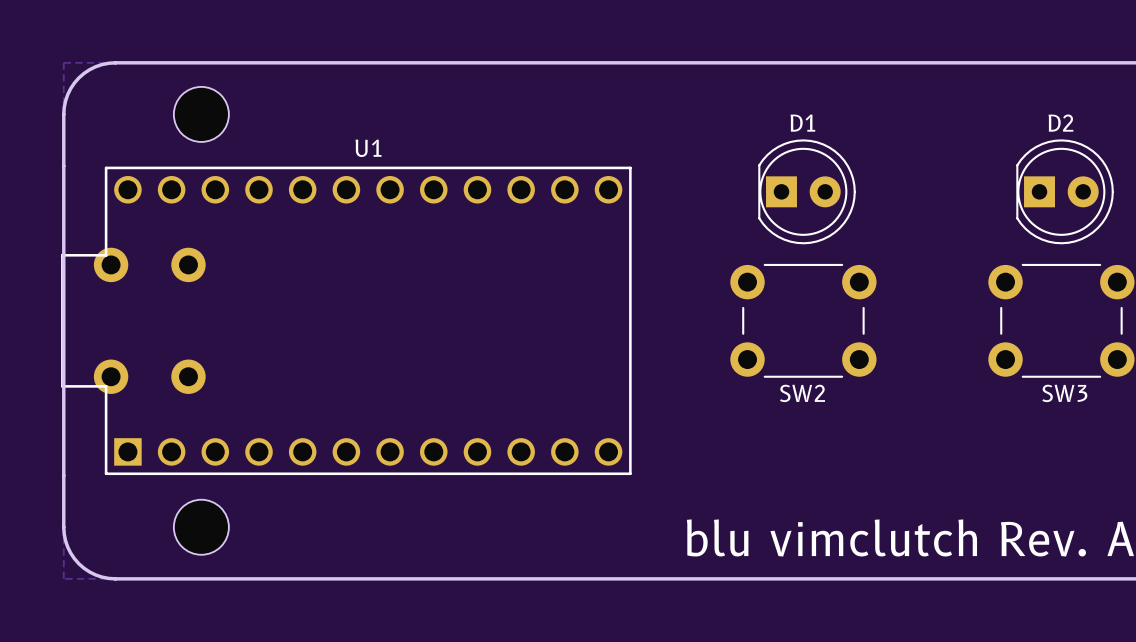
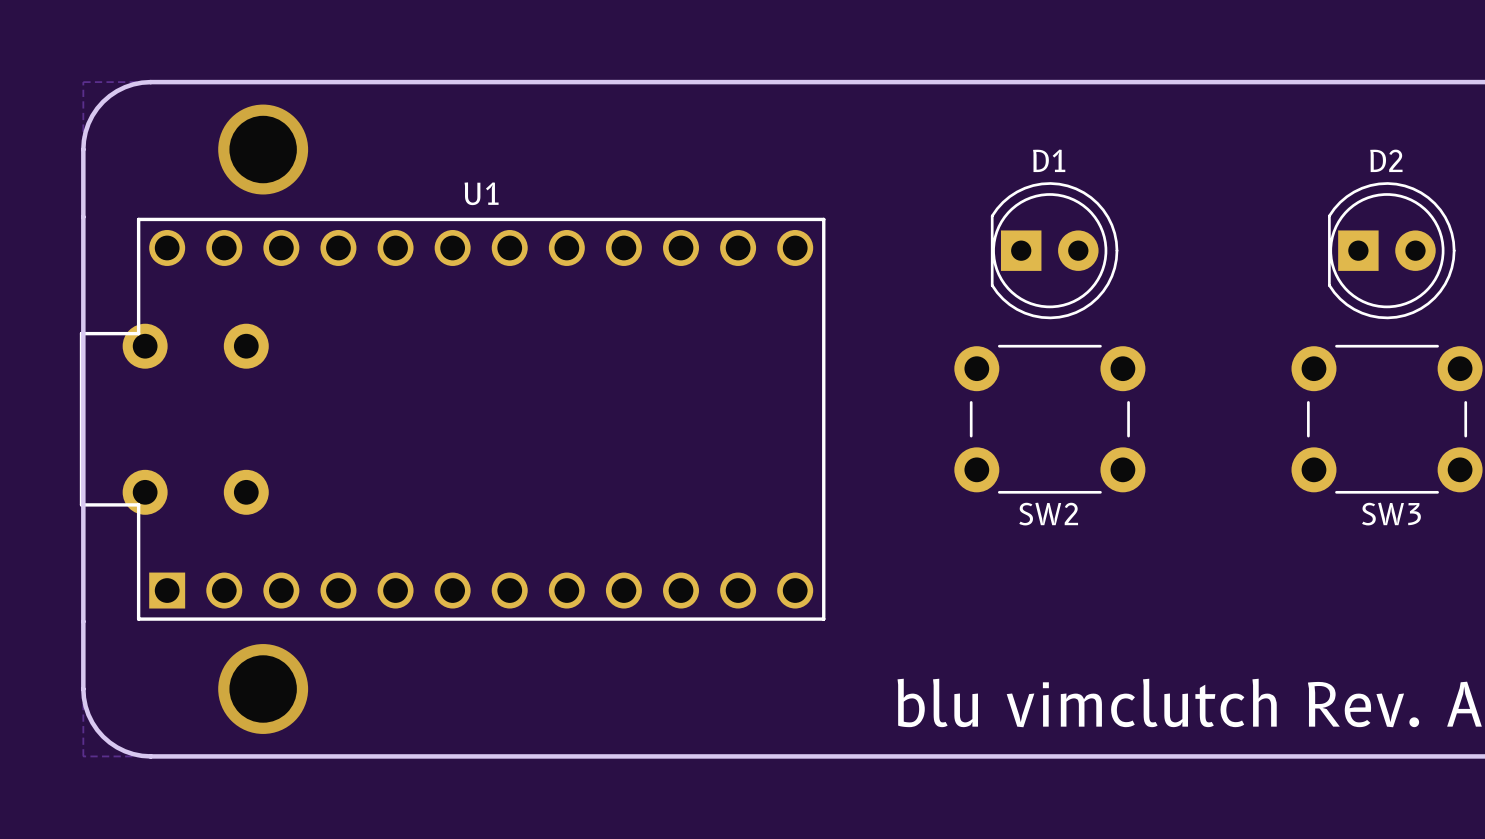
part: (201, 114) -> none
via: none -> (263, 149)
part: (201, 527) -> none
via: none -> (263, 688)

